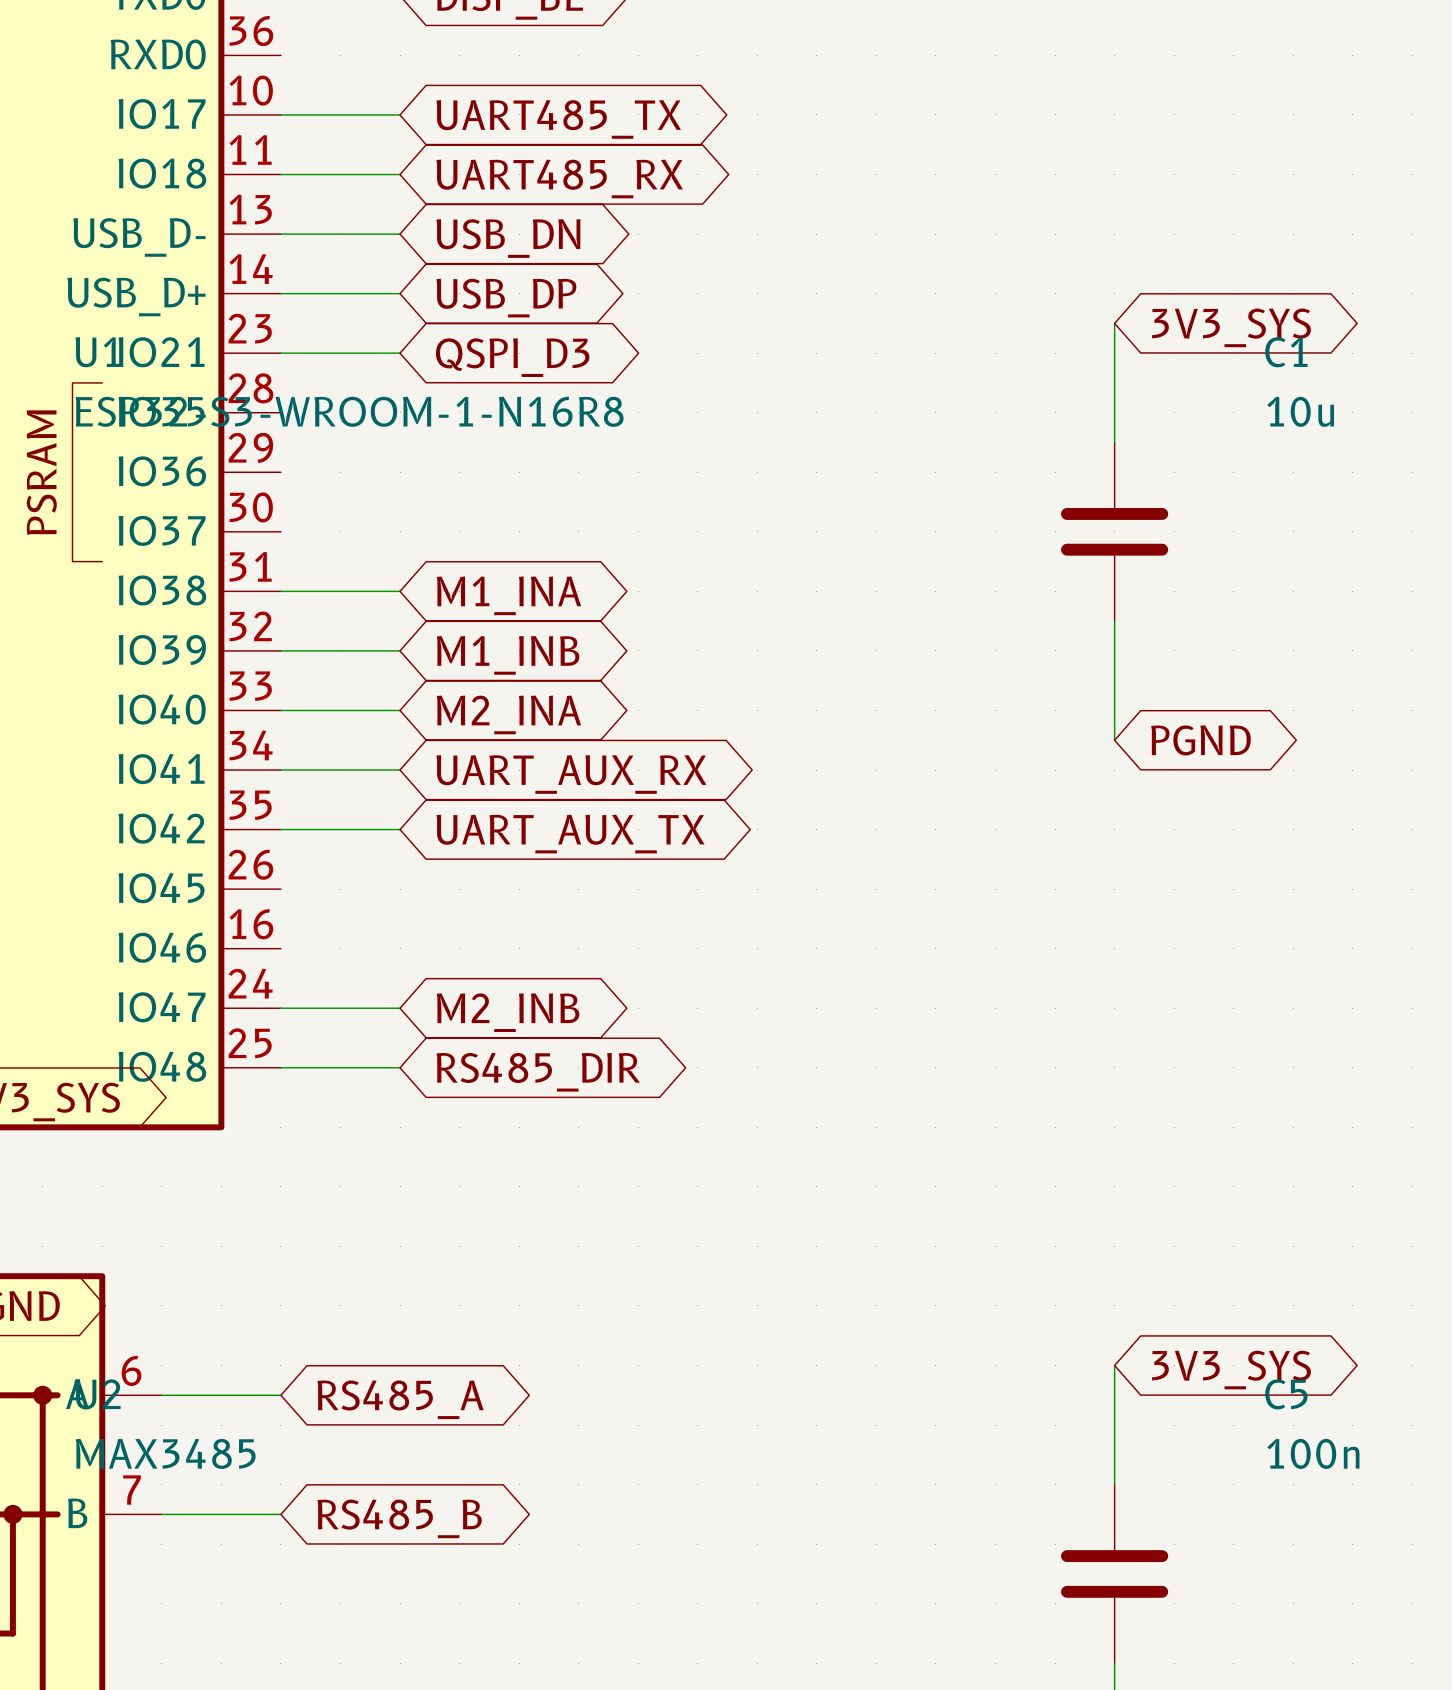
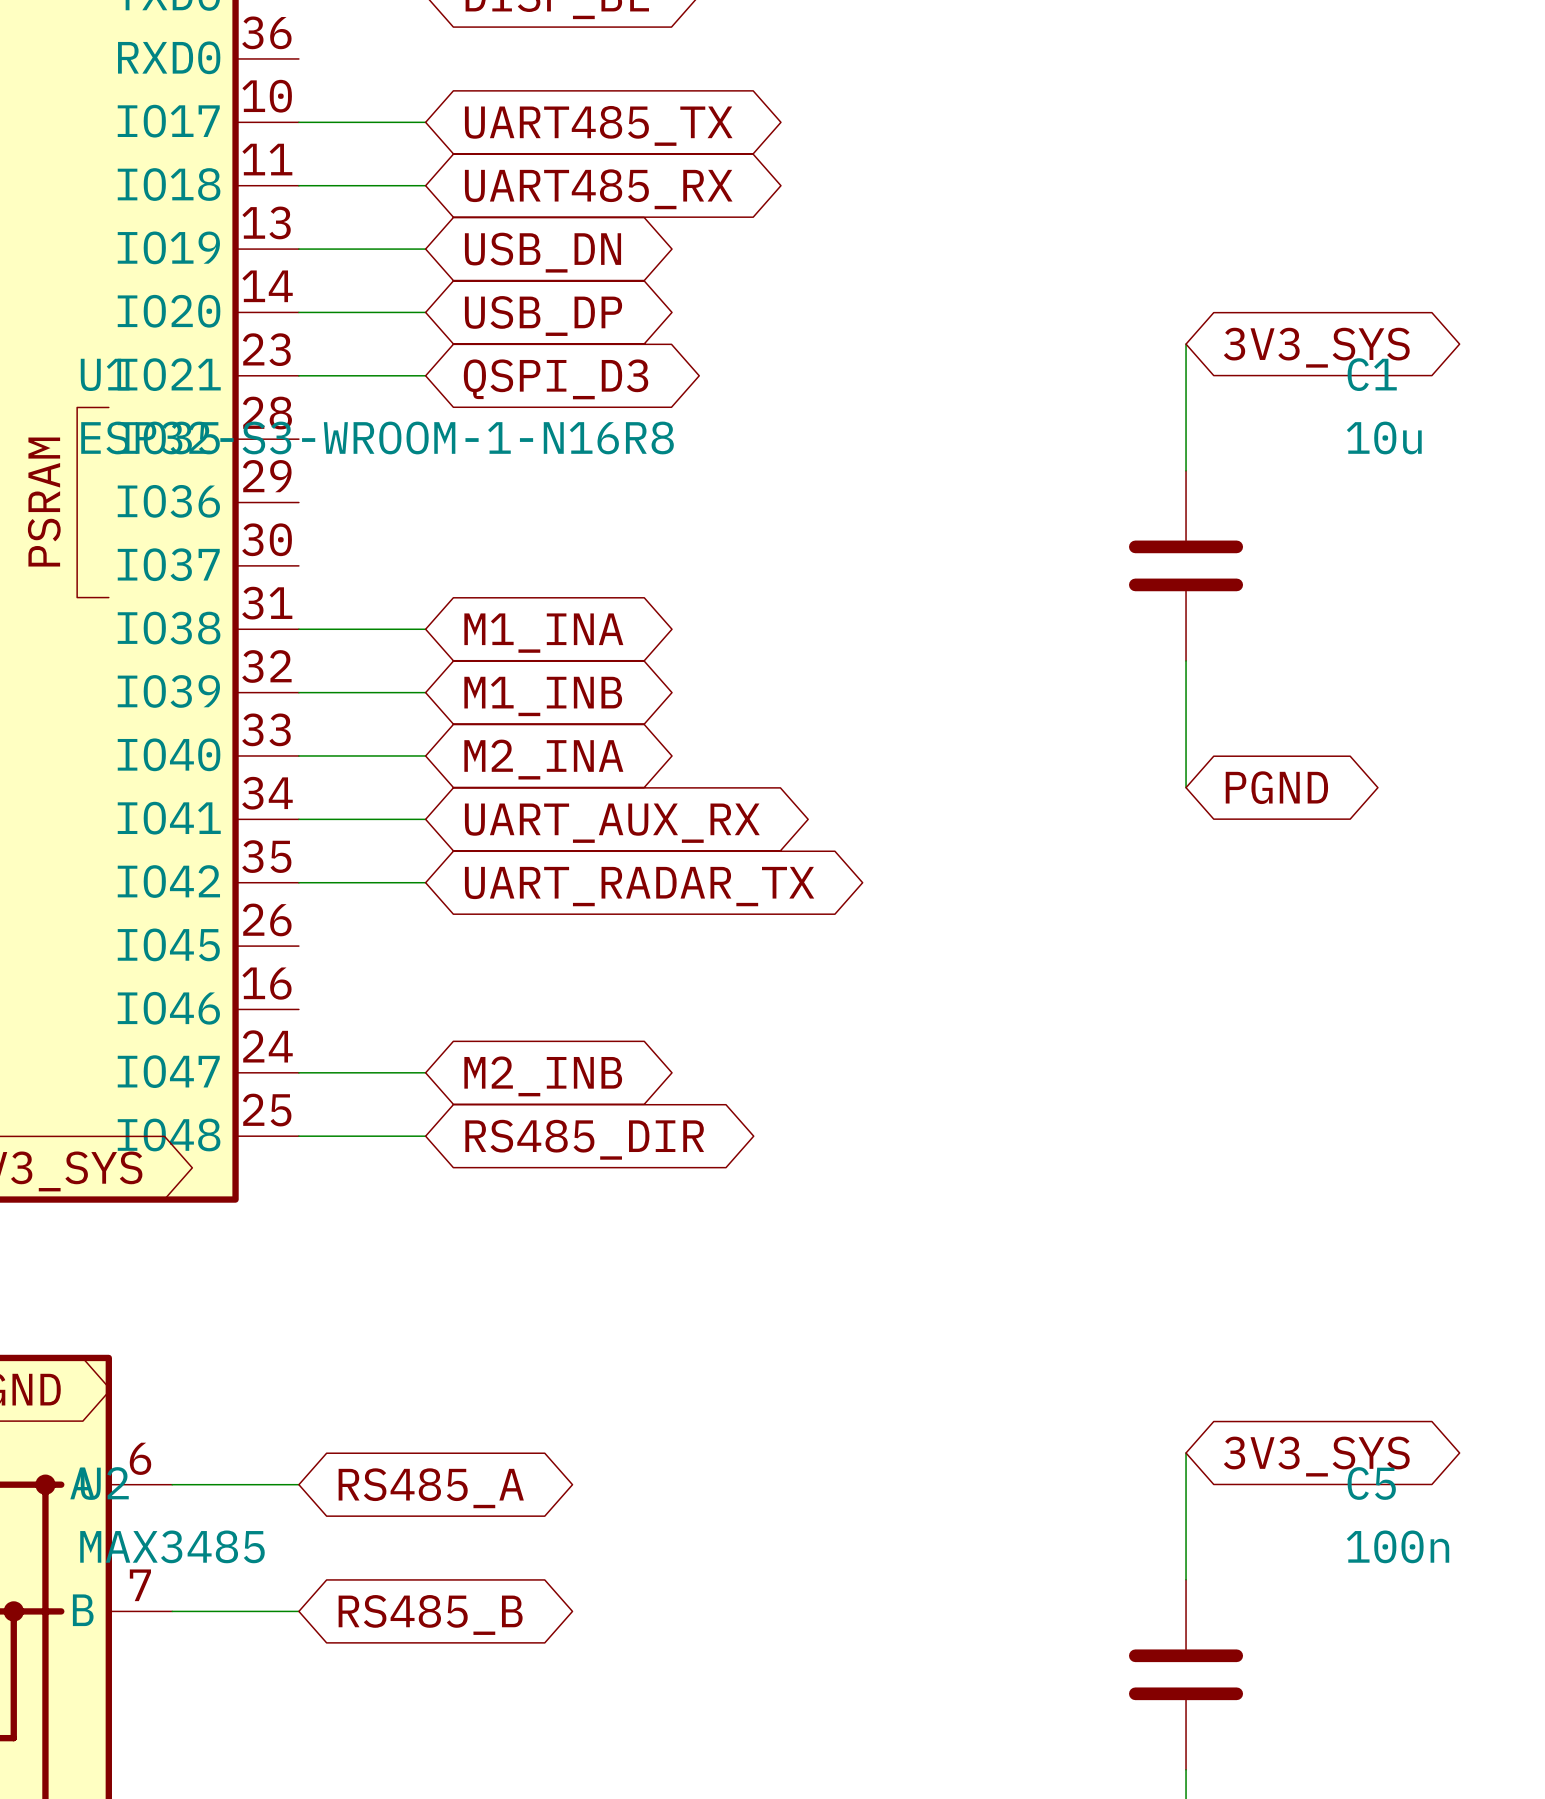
U1 pin name: USB_D- (139, 237) -> IO19 (168, 247)
U1 pin name: USB_D+ (136, 296) -> IO20 (169, 311)
global label: UART_AUX_TX (570, 834) -> UART_RADAR_TX (639, 886)

